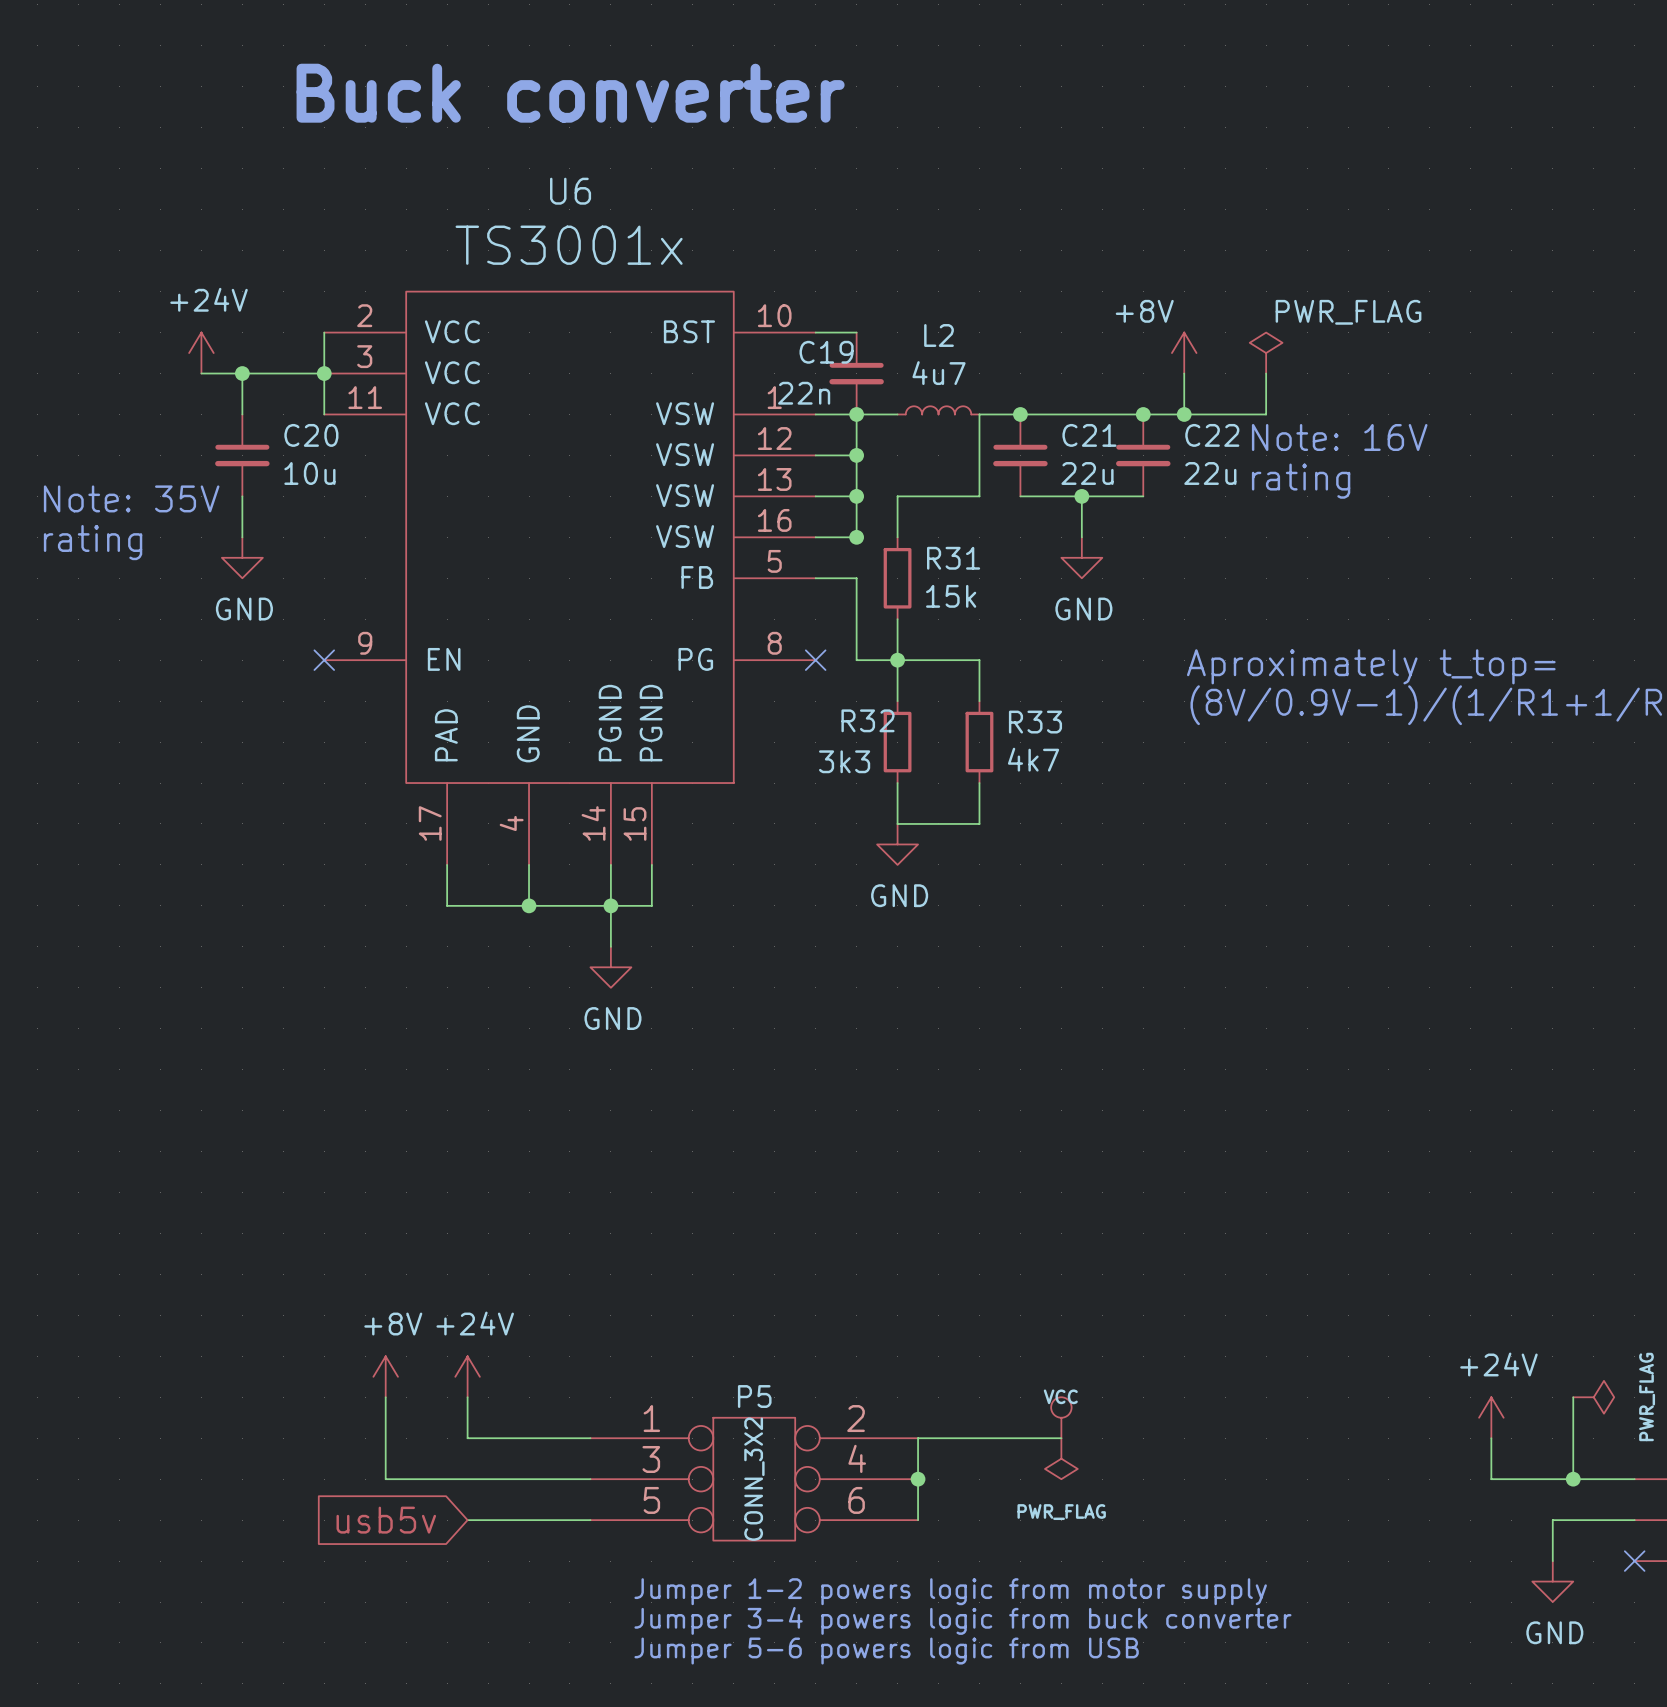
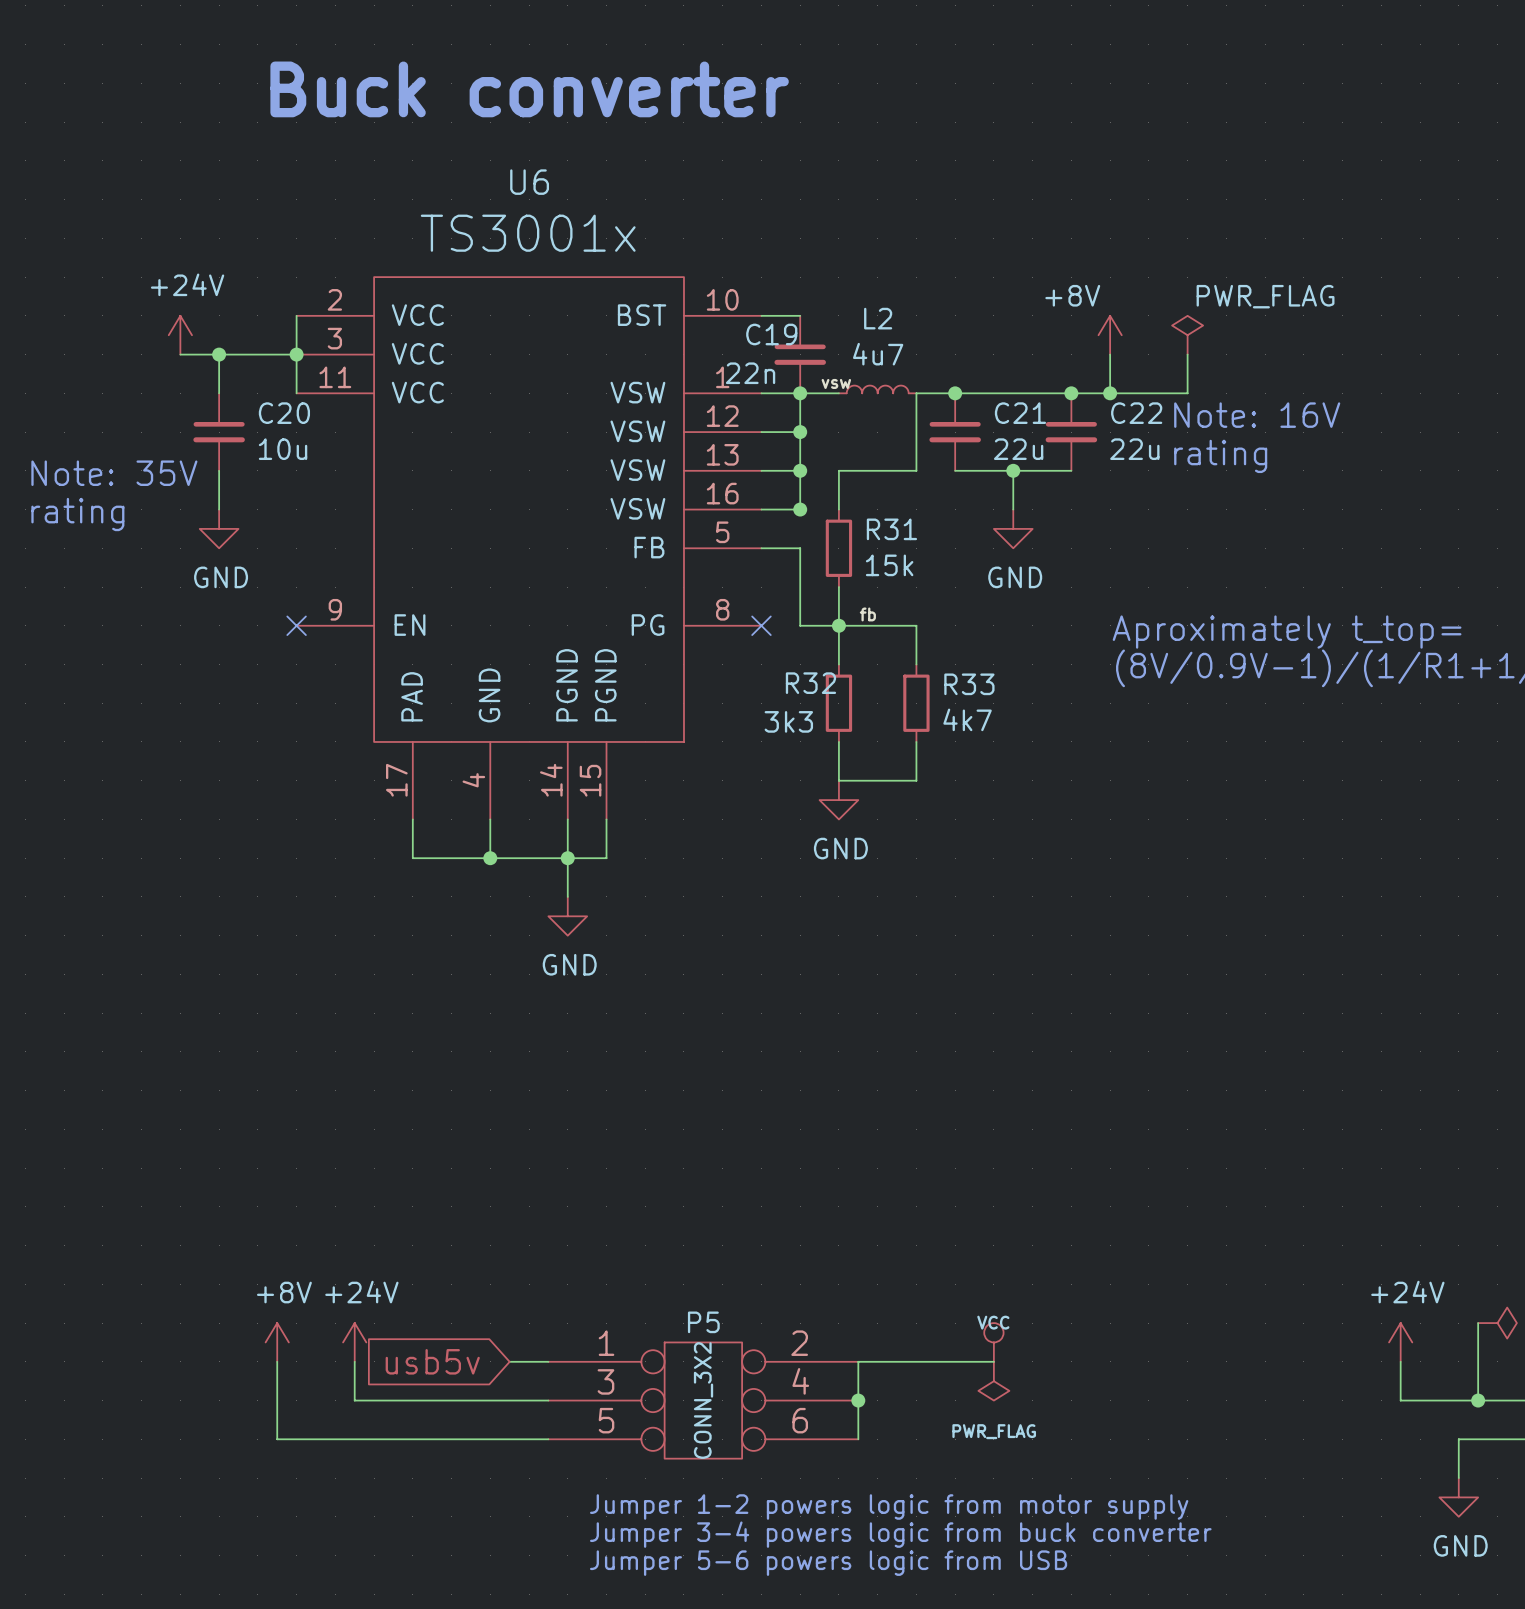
label: none -> vsw (836, 383)
label: none -> fb (867, 614)
power symbol position: +8V (385, 1376) -> +8V (277, 1342)
power symbol position: +24V (467, 1376) -> +24V (354, 1342)
wire: (467, 1397) (467, 1438) (549, 1438) -> none
wire: none -> (277, 1361) (277, 1439) (432, 1439)
global label position: usb5v (386, 1520) -> usb5v (432, 1361)

